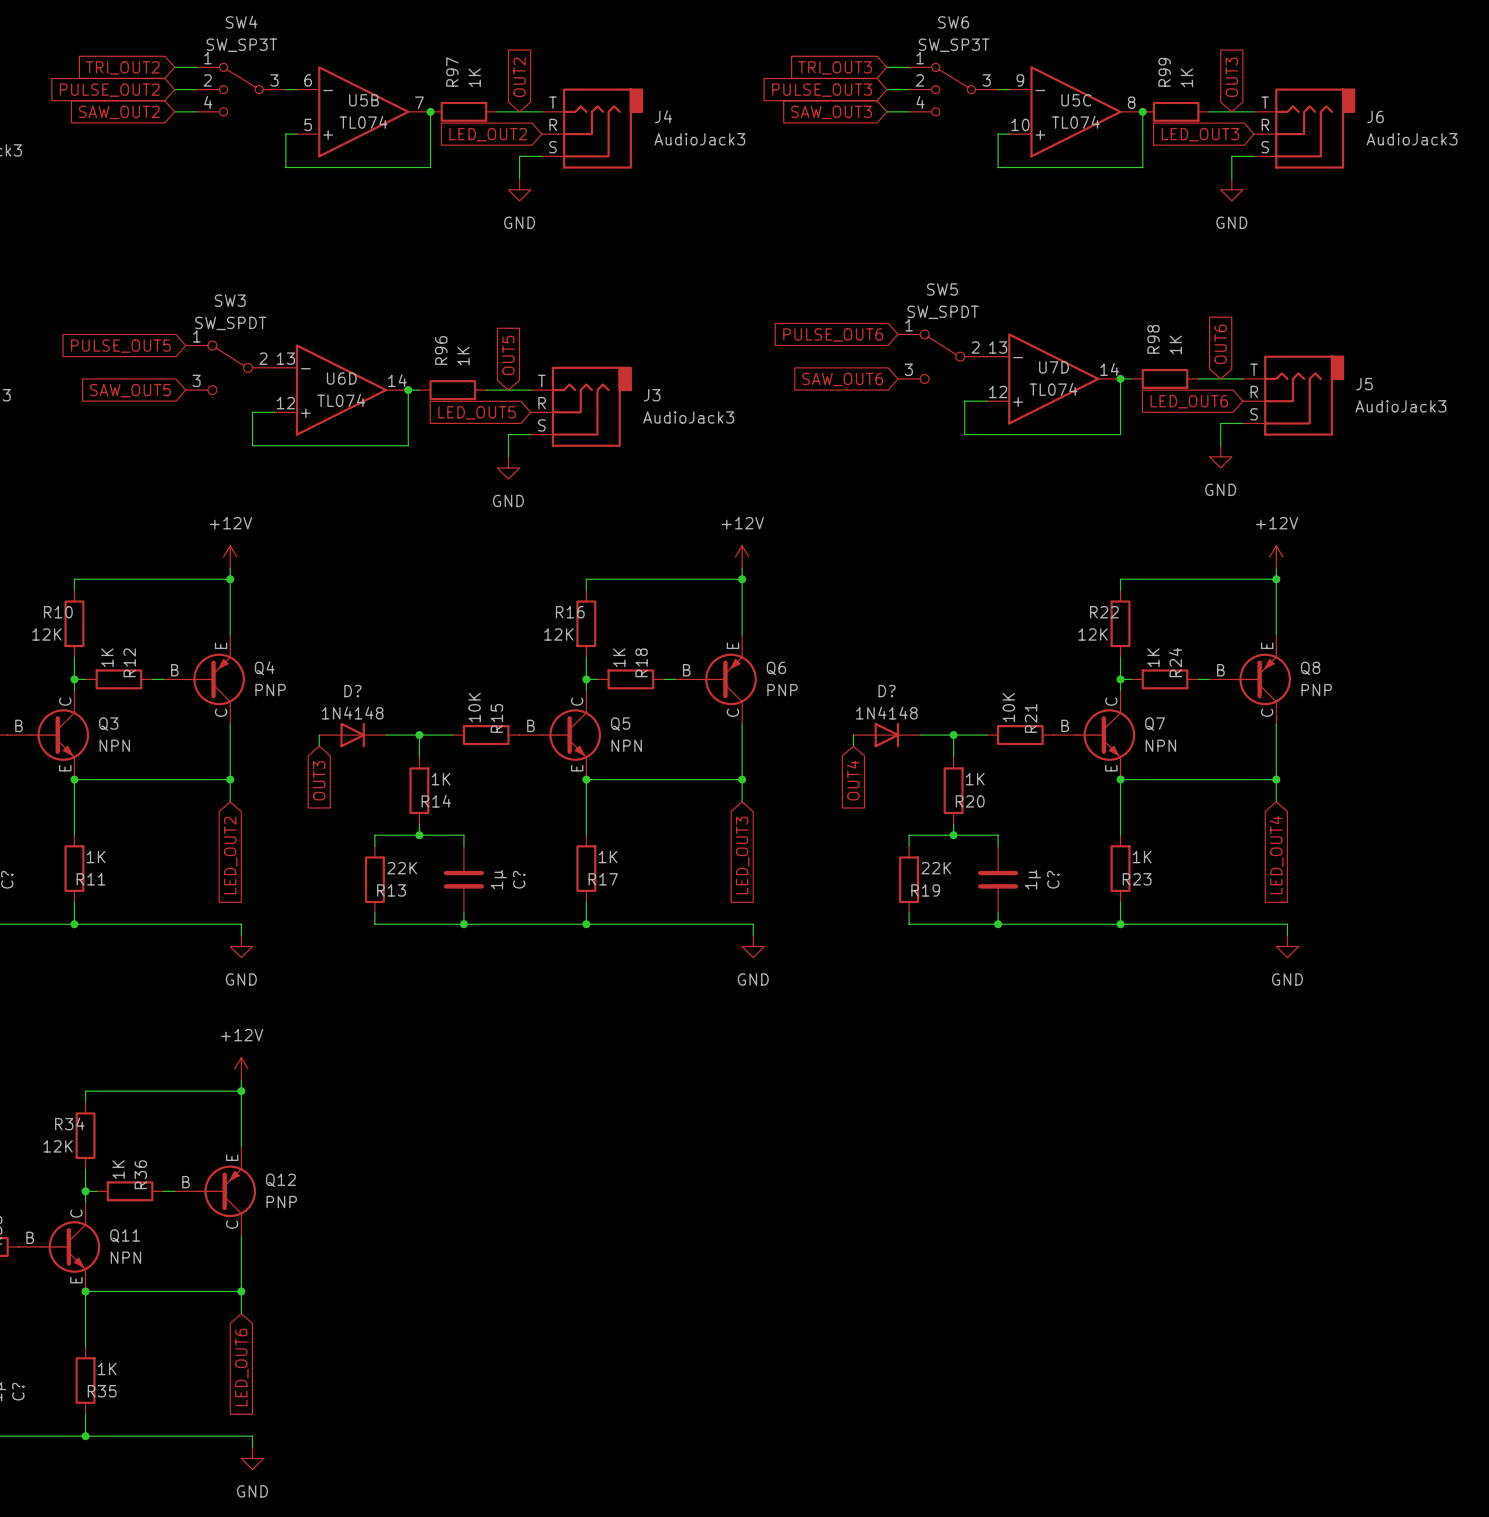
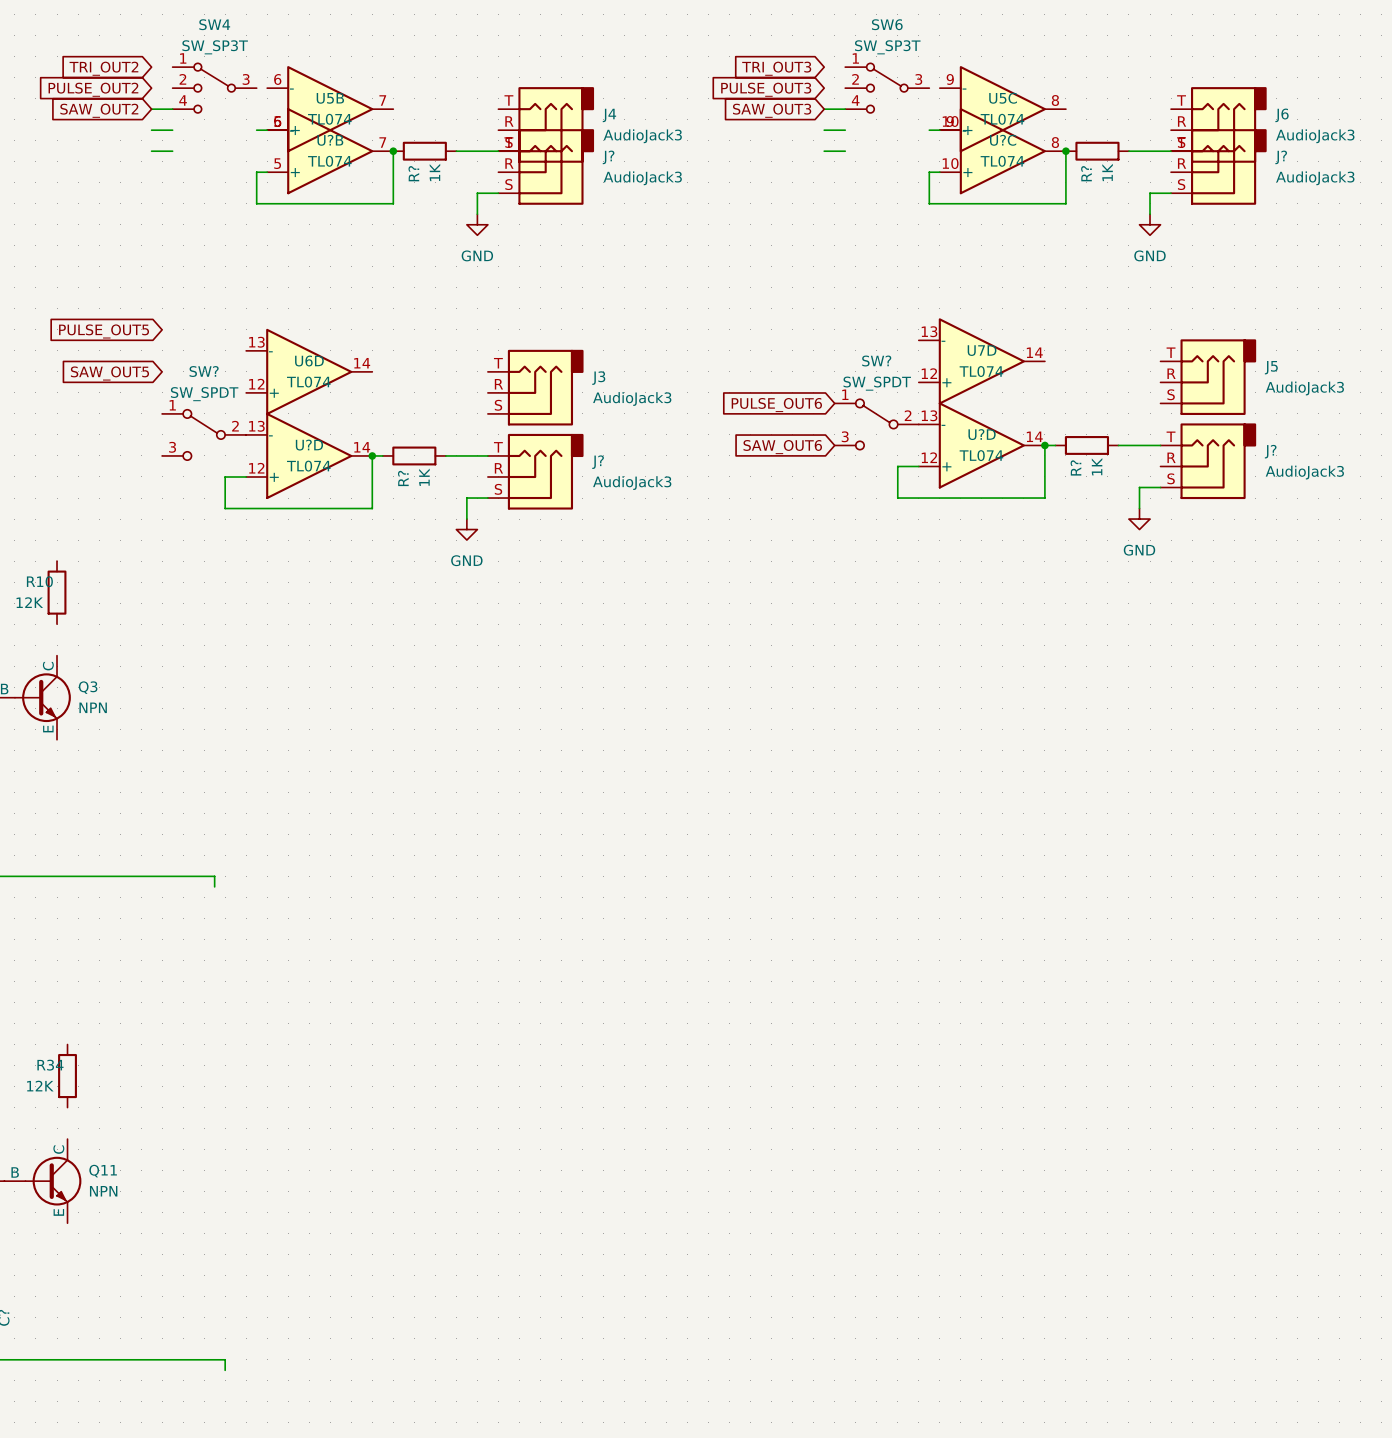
wire: (174, 67) (196, 67) -> (151, 151) (172, 151)
wire: (886, 67) (909, 67) -> (824, 151) (845, 151)
global label: OUT2 (519, 77) -> none
global label: OUT3 (1231, 77) -> none
wire: (174, 89) (196, 89) -> (151, 130) (172, 130)
wire: (285, 89) (297, 89) -> none
wire: (886, 89) (909, 89) -> (824, 130) (845, 130)
wire: (998, 89) (1009, 89) -> none
wire: (430, 111) (430, 156) -> none
junction position: (430, 111) -> (393, 151)
R97: 1K (463, 111) -> none
wire: (497, 111) (541, 111) -> none
wire: (1142, 111) (1142, 156) -> none
junction position: (1142, 111) -> (1065, 151)
R99: 1K (1176, 111) -> none
wire: (1209, 111) (1254, 111) -> none
wire: (285, 134) (285, 167) (430, 167) -> (267, 172) (256, 172) (256, 203) (393, 203) (393, 161)
global label: LED_OUT2 (488, 134) -> none
wire: (998, 134) (998, 167) (1142, 167) -> (939, 172) (929, 172) (929, 203) (1065, 203) (1065, 161)
global label: LED_OUT3 (1200, 134) -> none
U?B: none -> TL074 (330, 151)
R?: none -> 1K (424, 151)
wire: (519, 156) (519, 178) -> (477, 151) (456, 151)
U?C: none -> TL074 (1002, 151)
R?: none -> 1K (1097, 151)
wire: (1231, 156) (1231, 178) -> (1150, 151) (1128, 151)
J?: none -> AudioJack3 (546, 166)
J?: none -> AudioJack3 (1218, 166)
power symbol position: GND (519, 189) -> GND (477, 224)
power symbol position: GND (1231, 189) -> GND (1150, 224)
wire: none -> (498, 193) (477, 193) (477, 214)
wire: none -> (1171, 193) (1150, 193) (1150, 214)
global label position: PULSE_OUT6 (833, 334) -> PULSE_OUT6 (776, 405)
global label: OUT6 (1220, 344) -> none
global label: OUT5 (508, 355) -> none
SW5: SW_SPDT (942, 356) -> none
SW3: SW_SPDT (230, 367) -> none
junction: (1120, 378) -> none
wire: (1131, 378) (1120, 378) (1120, 434) (964, 434) (964, 401) (986, 401) -> (1055, 445) (1044, 445) (1044, 498) (897, 498) (897, 466) (918, 466)
R98: 1K (1165, 378) -> none
wire: (1198, 378) (1242, 378) -> (1118, 445) (1160, 445)
global label position: SAW_OUT6 (842, 379) -> SAW_OUT6 (782, 447)
junction: (408, 390) -> none
wire: (419, 390) (408, 390) (408, 445) (252, 445) (252, 412) (274, 412) -> (382, 455) (372, 455) (372, 508) (225, 508) (225, 476) (246, 476)
R96: 1K (452, 390) -> none
wire: (486, 390) (530, 390) -> (445, 455) (487, 455)
global label: LED_OUT6 (1189, 401) -> none
global label: LED_OUT5 (477, 412) -> none
wire: (1242, 423) (1220, 423) (1220, 445) -> (1160, 487) (1139, 487) (1139, 508)
wire: (530, 434) (508, 434) (508, 456) -> (487, 498) (466, 498) (466, 519)
SW?: none -> SW_SPDT (876, 424)
SW?: none -> SW_SPDT (204, 434)
power symbol position: GND (1220, 456) -> GND (1139, 519)
power symbol position: GND (508, 467) -> GND (466, 529)
U?D: none -> TL074 (981, 445)
junction: none -> (1044, 445)
R?: none -> 1K (1086, 445)
U?D: none -> TL074 (309, 455)
junction: none -> (372, 455)
R?: none -> 1K (414, 455)
J?: none -> AudioJack3 (1208, 461)
J?: none -> AudioJack3 (535, 471)
power symbol: +12V (230, 557) -> none
power symbol: +12V (742, 557) -> none
power symbol: +12V (1276, 557) -> none
wire: (230, 568) (230, 634) -> none
wire: (742, 568) (742, 634) -> none
wire: (1276, 568) (1276, 634) -> none
wire: (230, 579) (74, 579) (74, 590) -> none
junction: (230, 579) -> none
wire: (742, 579) (586, 579) (586, 590) -> none
junction: (742, 579) -> none
wire: (1276, 579) (1120, 579) (1120, 590) -> none
junction: (1276, 579) -> none
R16: 12K (586, 623) -> none
R22: 12K (1120, 623) -> none
wire: (74, 657) (74, 690) -> none
wire: (586, 657) (586, 690) -> none
wire: (1120, 657) (1120, 690) -> none
wire: (74, 679) (85, 679) -> none
junction: (74, 679) -> none
R12: 1K (118, 679) -> none
wire: (152, 679) (163, 679) -> none
Q4: PNP (204, 679) -> none
wire: (586, 679) (597, 679) -> none
junction: (586, 679) -> none
R18: 1K (630, 679) -> none
wire: (664, 679) (675, 679) -> none
Q6: PNP (716, 679) -> none
wire: (1120, 679) (1131, 679) -> none
junction: (1120, 679) -> none
R24: 1K (1165, 679) -> none
wire: (1198, 679) (1209, 679) -> none
Q8: PNP (1250, 679) -> none
wire: (230, 723) (230, 801) -> none
wire: (742, 723) (742, 801) -> none
wire: (1276, 723) (1276, 801) -> none
wire: (319, 735) (319, 746) -> none
D?: 1N4148 (352, 735) -> none
wire: (386, 735) (452, 735) -> none
wire: (419, 735) (419, 757) -> none
junction: (419, 735) -> none
R15: 10K (486, 735) -> none
Q5: NPN (560, 735) -> none
wire: (853, 735) (853, 746) -> none
D?: 1N4148 (886, 735) -> none
wire: (920, 735) (986, 735) -> none
wire: (953, 735) (953, 757) -> none
junction: (953, 735) -> none
R21: 10K (1020, 735) -> none
Q7: NPN (1094, 735) -> none
junction: (74, 779) -> none
wire: (230, 779) (74, 779) (74, 835) -> none
junction: (230, 779) -> none
junction: (586, 779) -> none
wire: (742, 779) (586, 779) (586, 835) -> none
junction: (742, 779) -> none
junction: (1120, 779) -> none
wire: (1276, 779) (1120, 779) (1120, 835) -> none
junction: (1276, 779) -> none
global label: OUT3 (319, 780) -> none
global label: OUT4 (853, 780) -> none
R14: 1K (419, 790) -> none
R20: 1K (953, 790) -> none
wire: (419, 824) (419, 835) -> none
wire: (953, 824) (953, 835) -> none
junction: (419, 835) -> none
junction: (953, 835) -> none
wire: (374, 846) (374, 835) (463, 835) (463, 846) -> none
wire: (909, 846) (909, 835) (998, 835) (998, 846) -> none
global label: LED_OUT2 (230, 855) -> none
global label: LED_OUT3 (742, 855) -> none
global label: LED_OUT4 (1276, 855) -> none
R11: 1K (74, 868) -> none
R17: 1K (586, 868) -> none
R23: 1K (1120, 868) -> none
R13: 22K (374, 879) -> none
C?: 1µ (463, 879) -> none
R19: 22K (909, 879) -> none
C?: 1µ (998, 879) -> none
wire: (74, 901) (74, 924) -> none
wire: (586, 901) (586, 924) -> none
wire: (1120, 901) (1120, 924) -> none
wire: (374, 913) (374, 924) (753, 924) (753, 935) -> none
wire: (463, 913) (463, 924) -> none
wire: (909, 913) (909, 924) (1287, 924) (1287, 935) -> none
wire: (998, 913) (998, 924) -> none
junction: (74, 924) -> none
junction: (463, 924) -> none
junction: (586, 924) -> none
junction: (998, 924) -> none
junction: (1120, 924) -> none
power symbol: GND (241, 946) -> none
power symbol: GND (753, 946) -> none
power symbol: GND (1287, 946) -> none
power symbol: +12V (241, 1068) -> none
wire: (241, 1080) (241, 1146) -> none
wire: (241, 1091) (85, 1091) (85, 1102) -> none
junction: (241, 1091) -> none
wire: (85, 1169) (85, 1202) -> none
wire: (85, 1191) (96, 1191) -> none
junction: (85, 1191) -> none
R36: 1K (130, 1191) -> none
wire: (163, 1191) (174, 1191) -> none
Q12: PNP (215, 1191) -> none
wire: (241, 1235) (241, 1313) -> none
junction: (85, 1291) -> none
wire: (241, 1291) (85, 1291) (85, 1347) -> none
junction: (241, 1291) -> none
global label: LED_OUT6 (241, 1367) -> none
R35: 1K (85, 1380) -> none
wire: (85, 1413) (85, 1436) -> none
junction: (85, 1436) -> none
power symbol: GND (252, 1458) -> none

